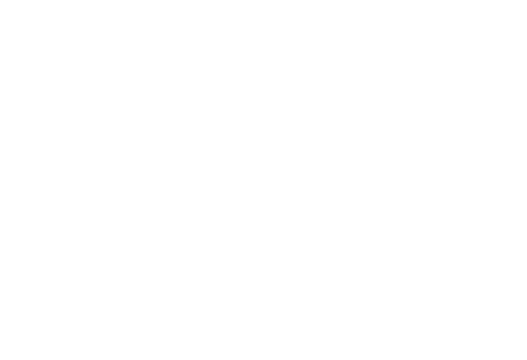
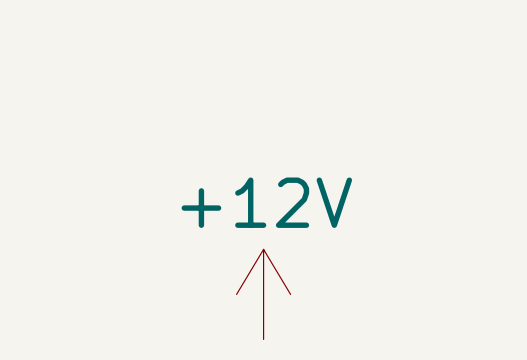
power symbol: none -> +12V (263, 294)

